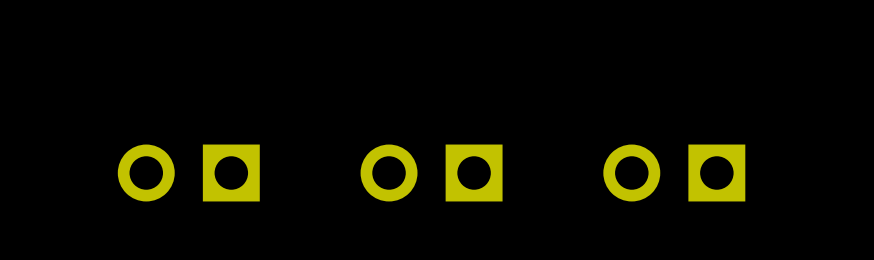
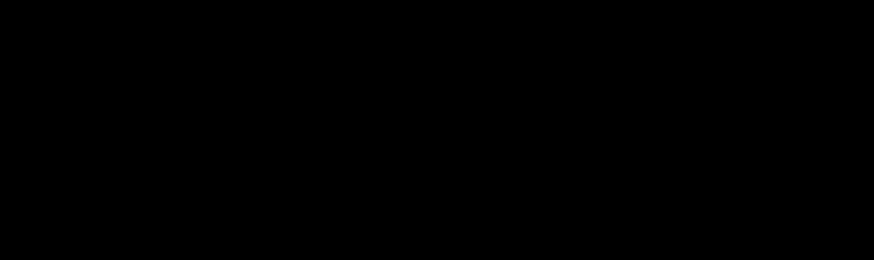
part: (188, 173) -> none
part: (431, 173) -> none
part: (674, 173) -> none

